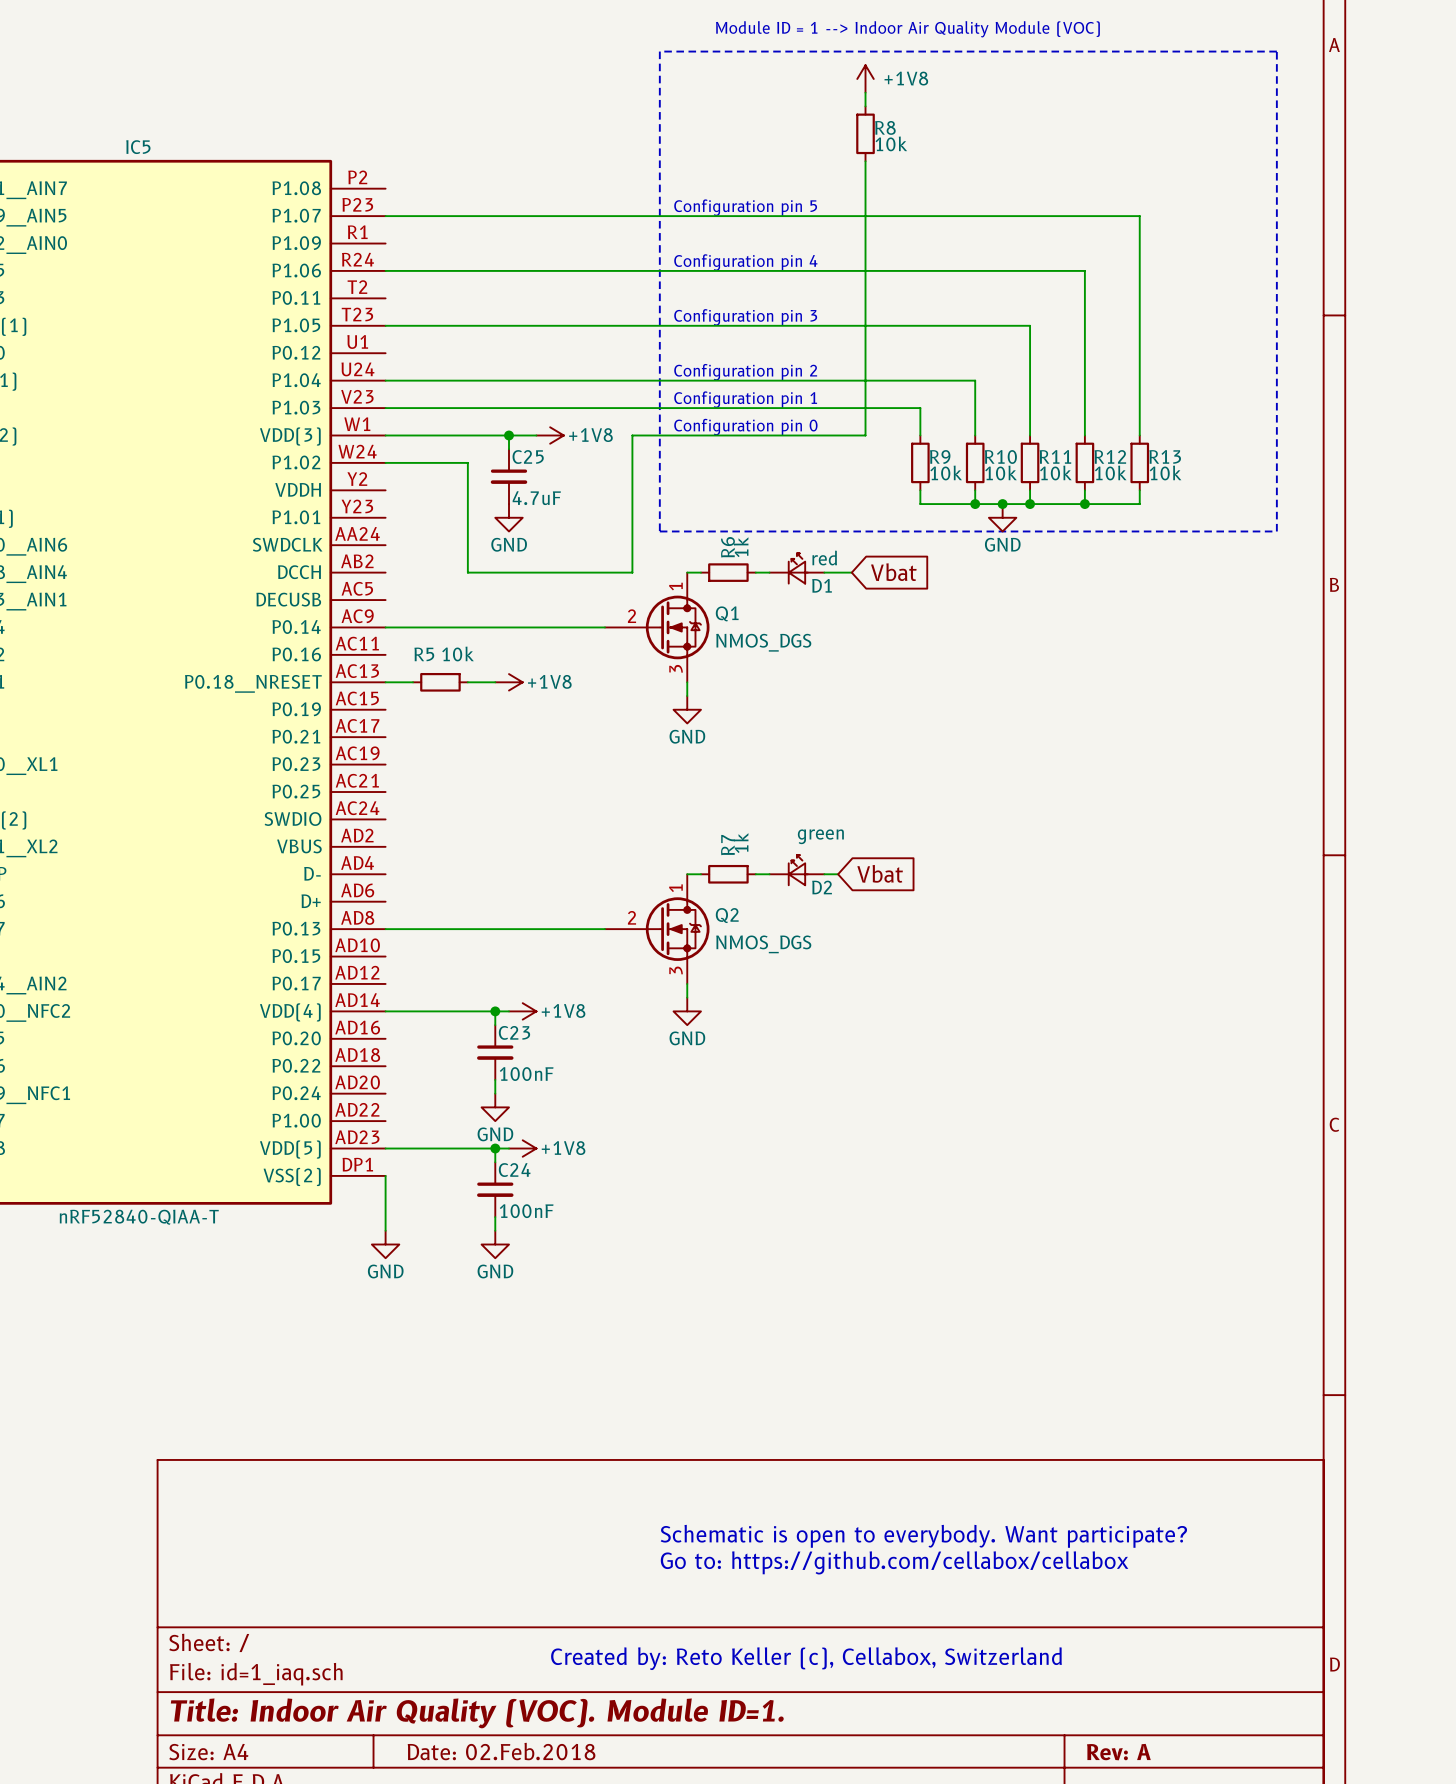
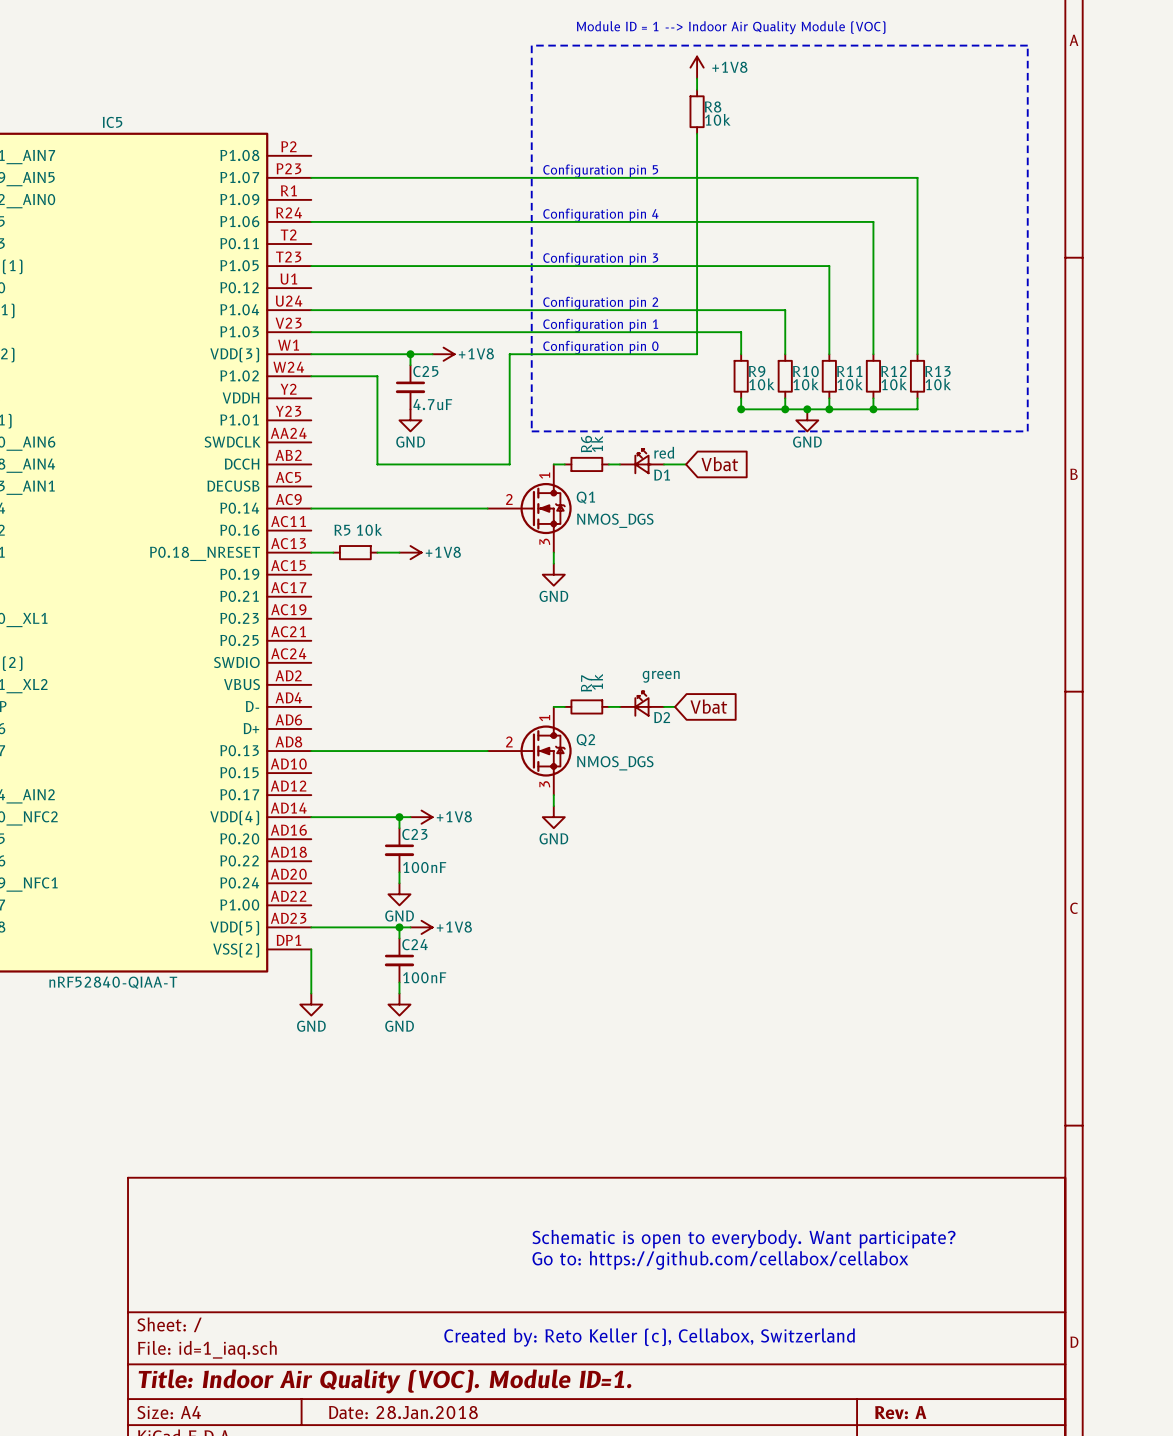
junction: none -> (741, 409)
title block: Date: 02.Feb.2018 (501, 1751) -> Date: 28.Jan.2018 (403, 1412)

